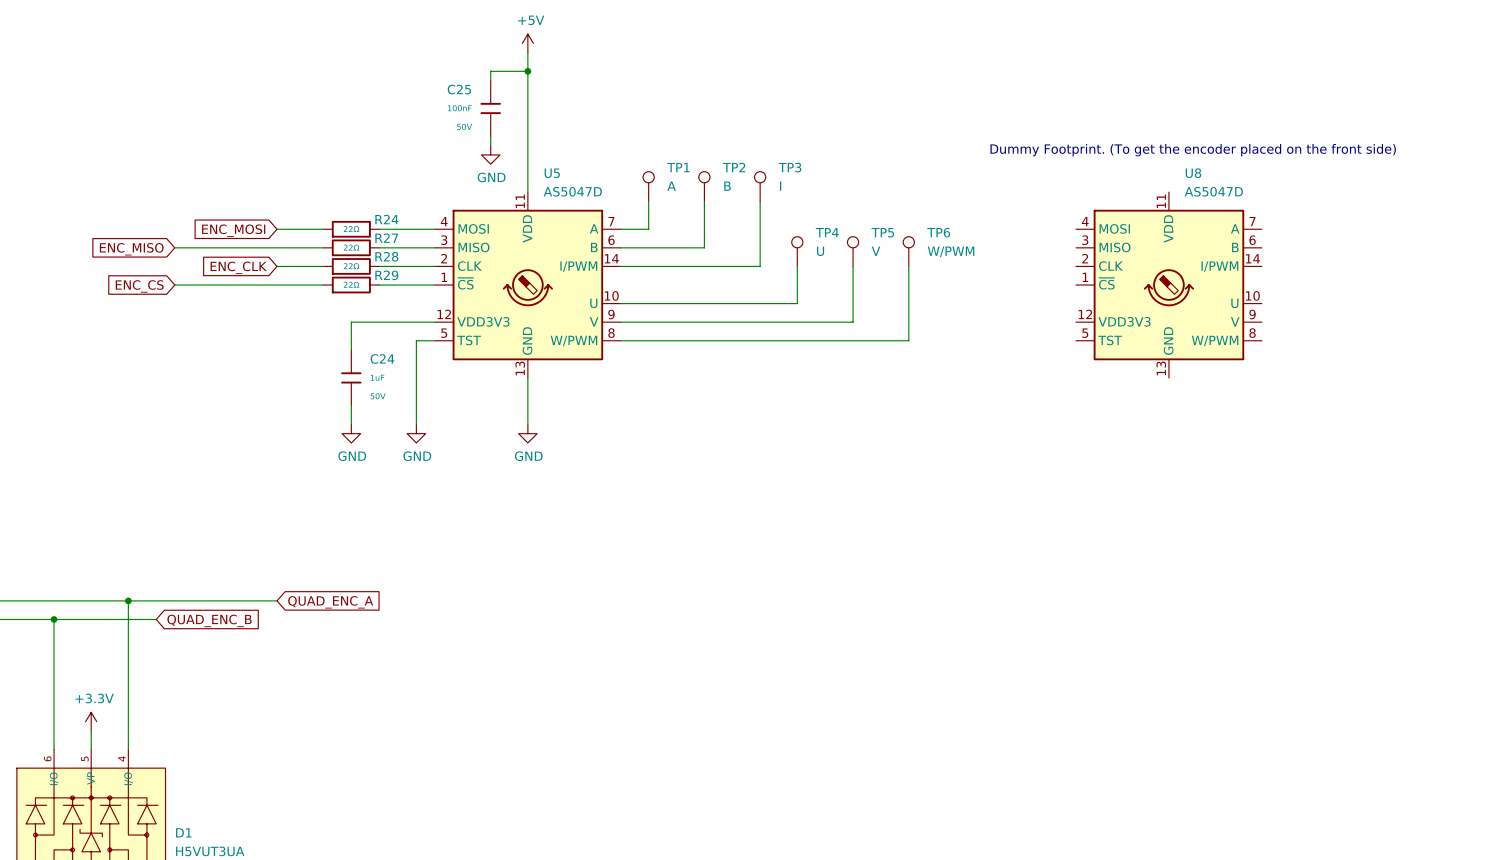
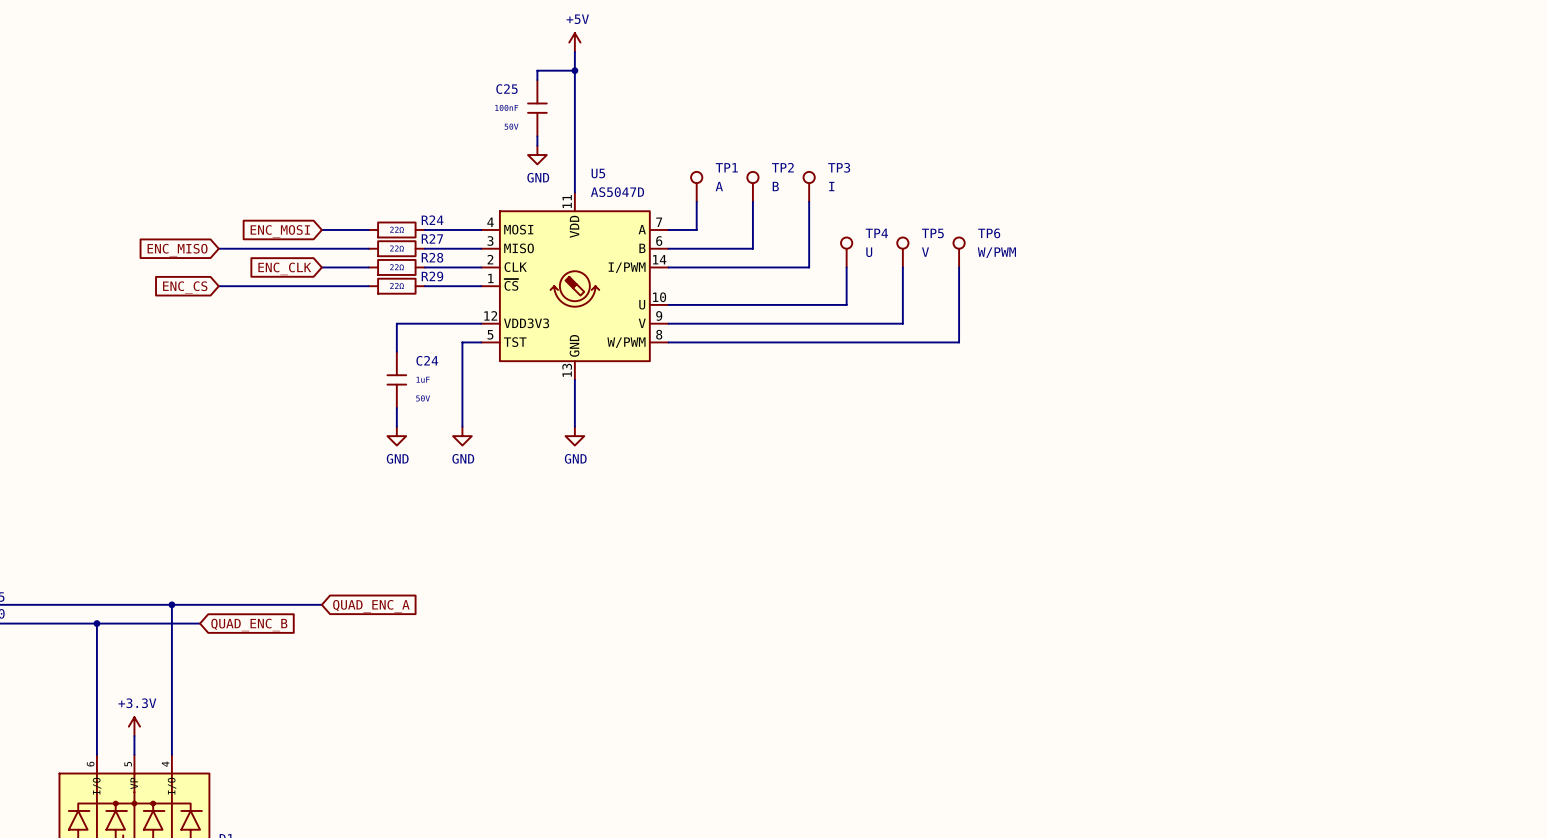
text: Dummy Footprint. (To get the encoder placed on the front side) (1193, 150) -> none
U8: AS5047D (1168, 285) -> none

